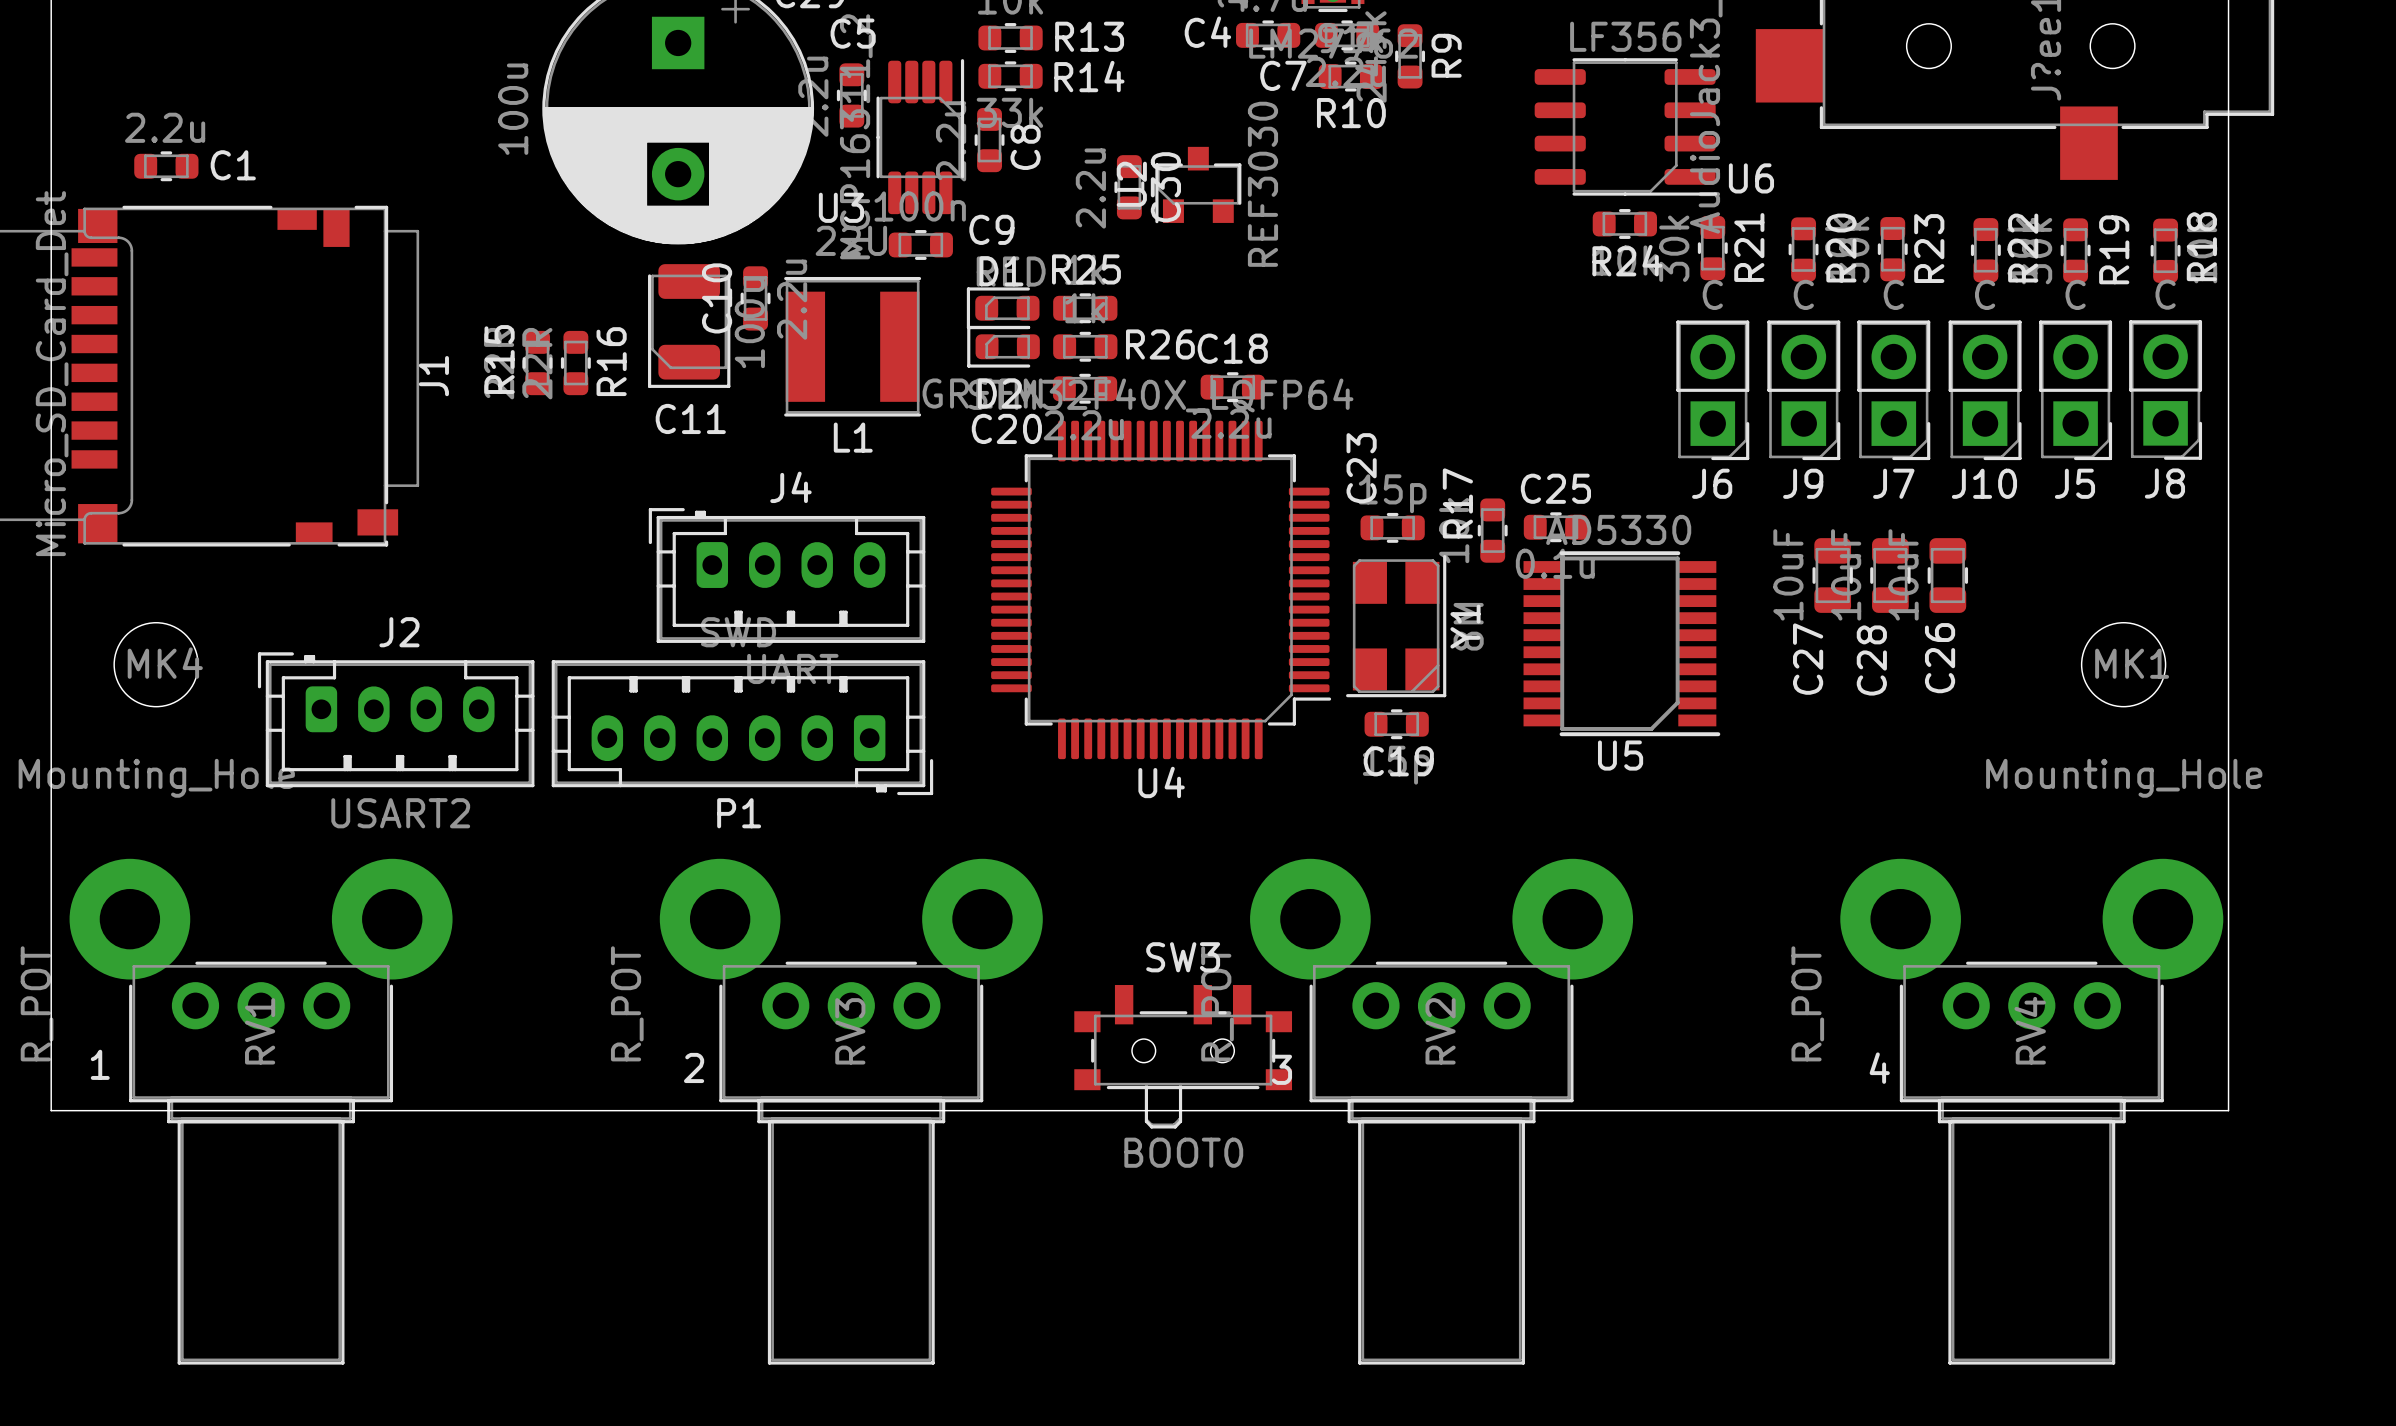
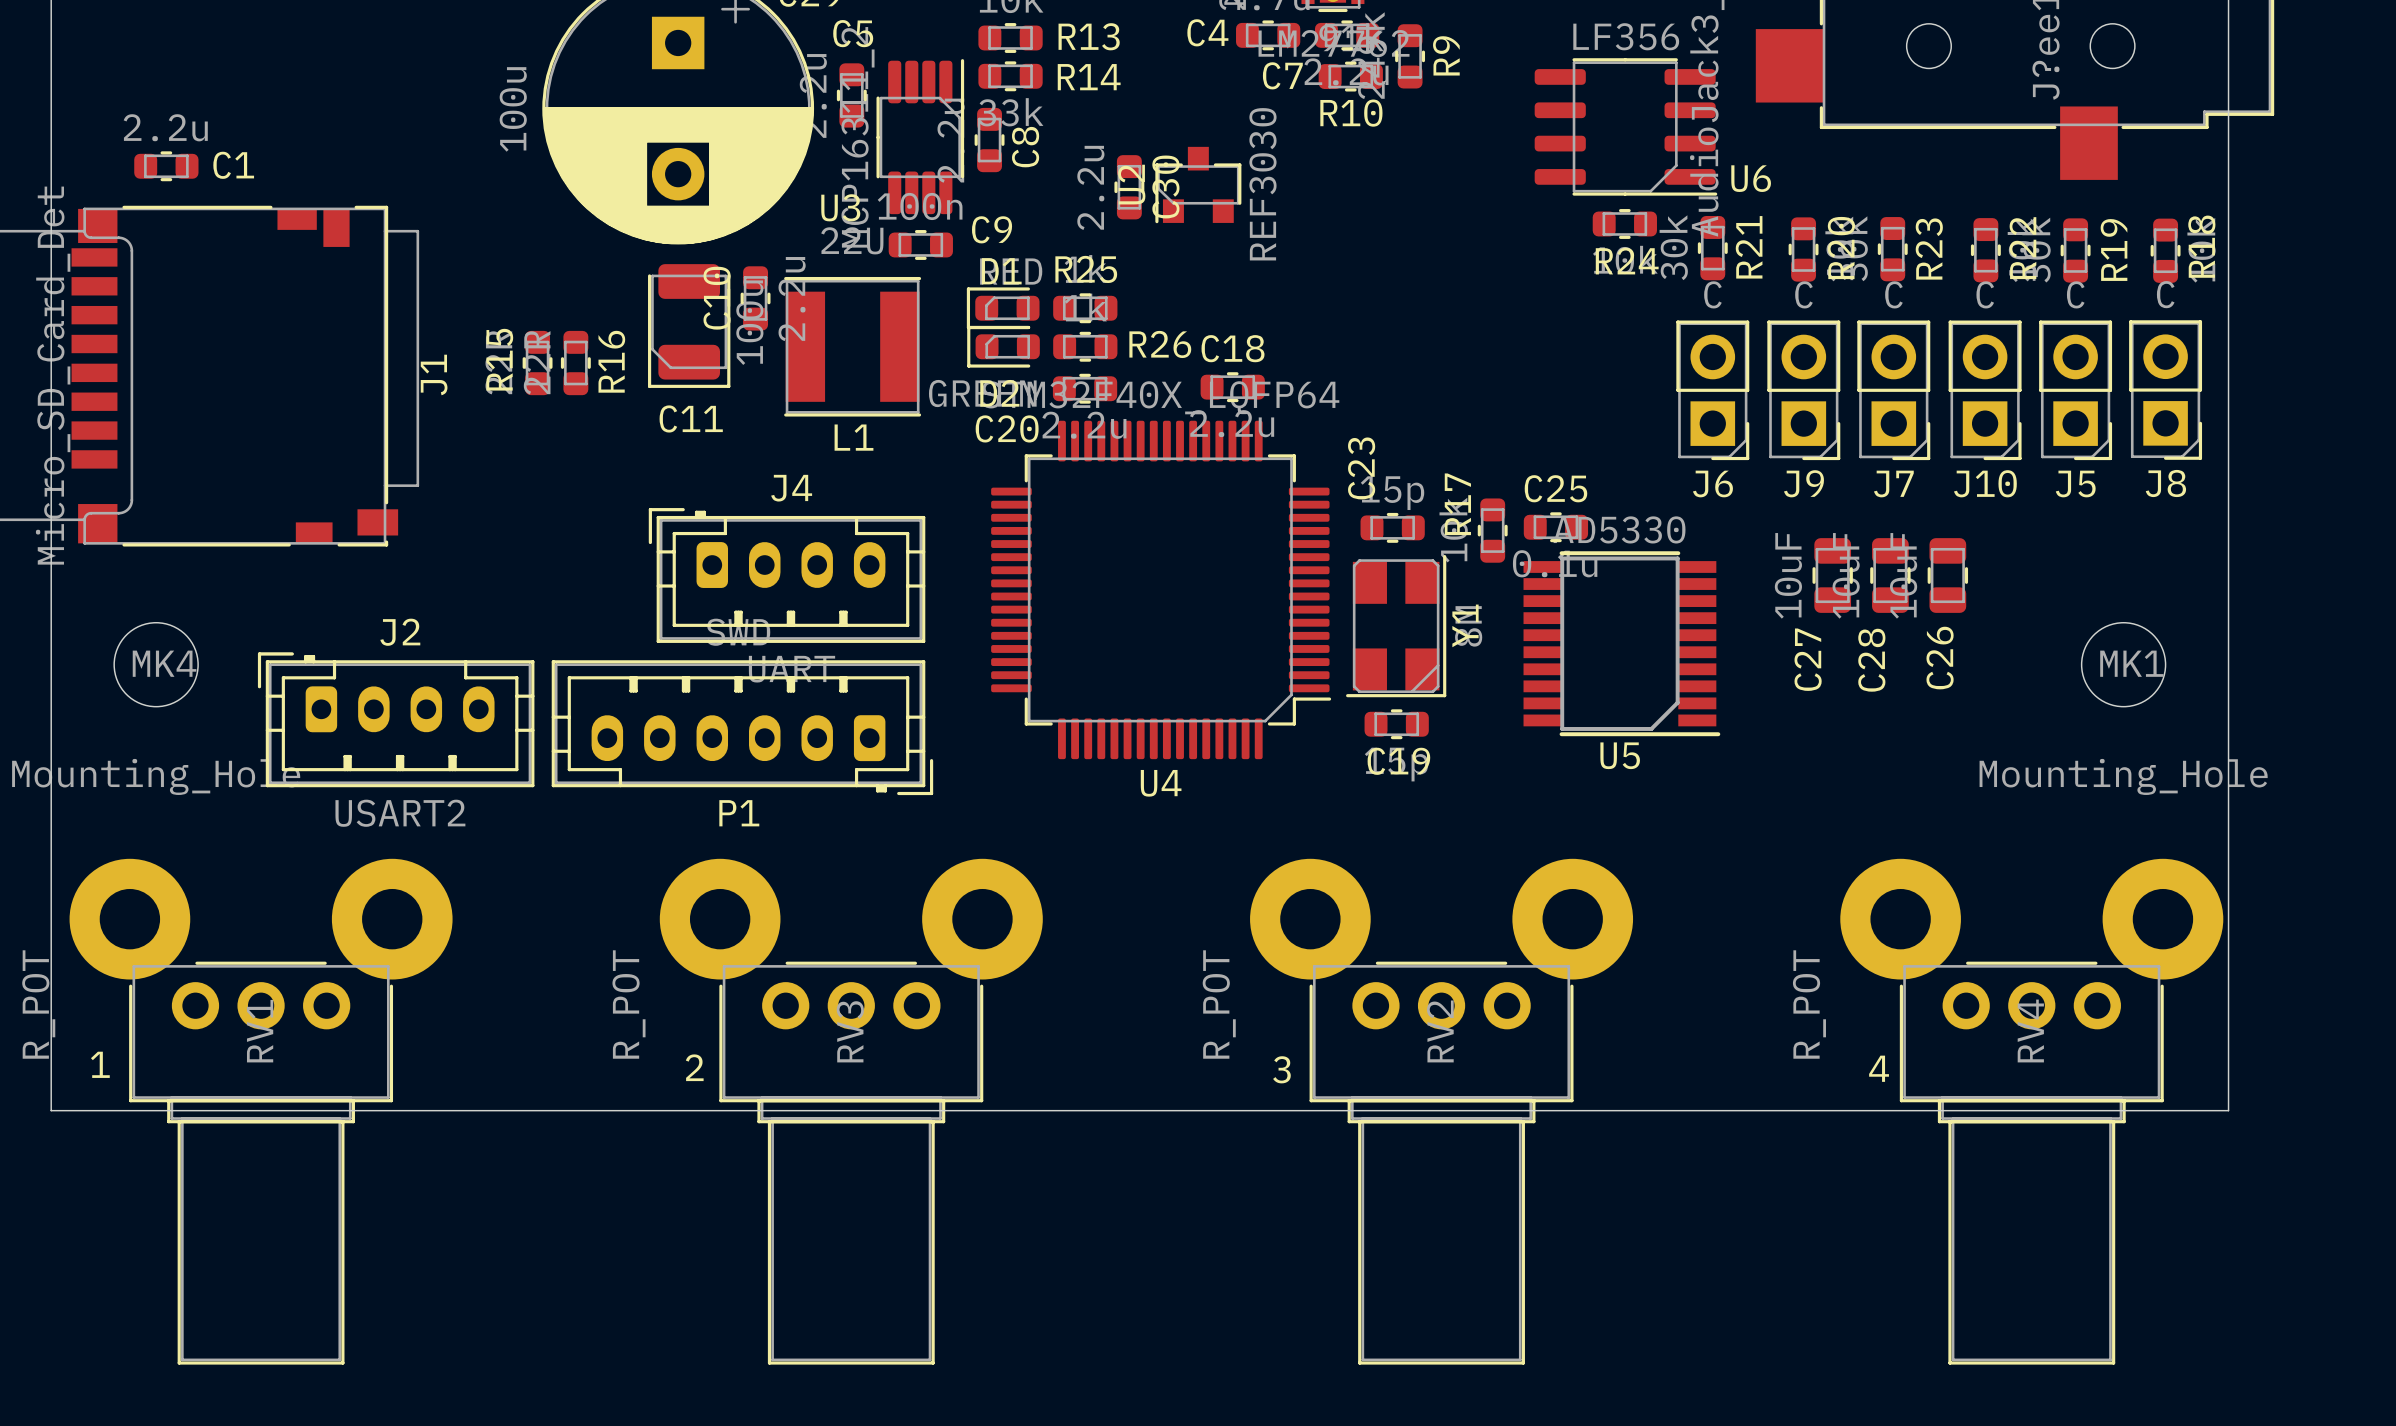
SW3: BOOT0 (1183, 1056) -> none

